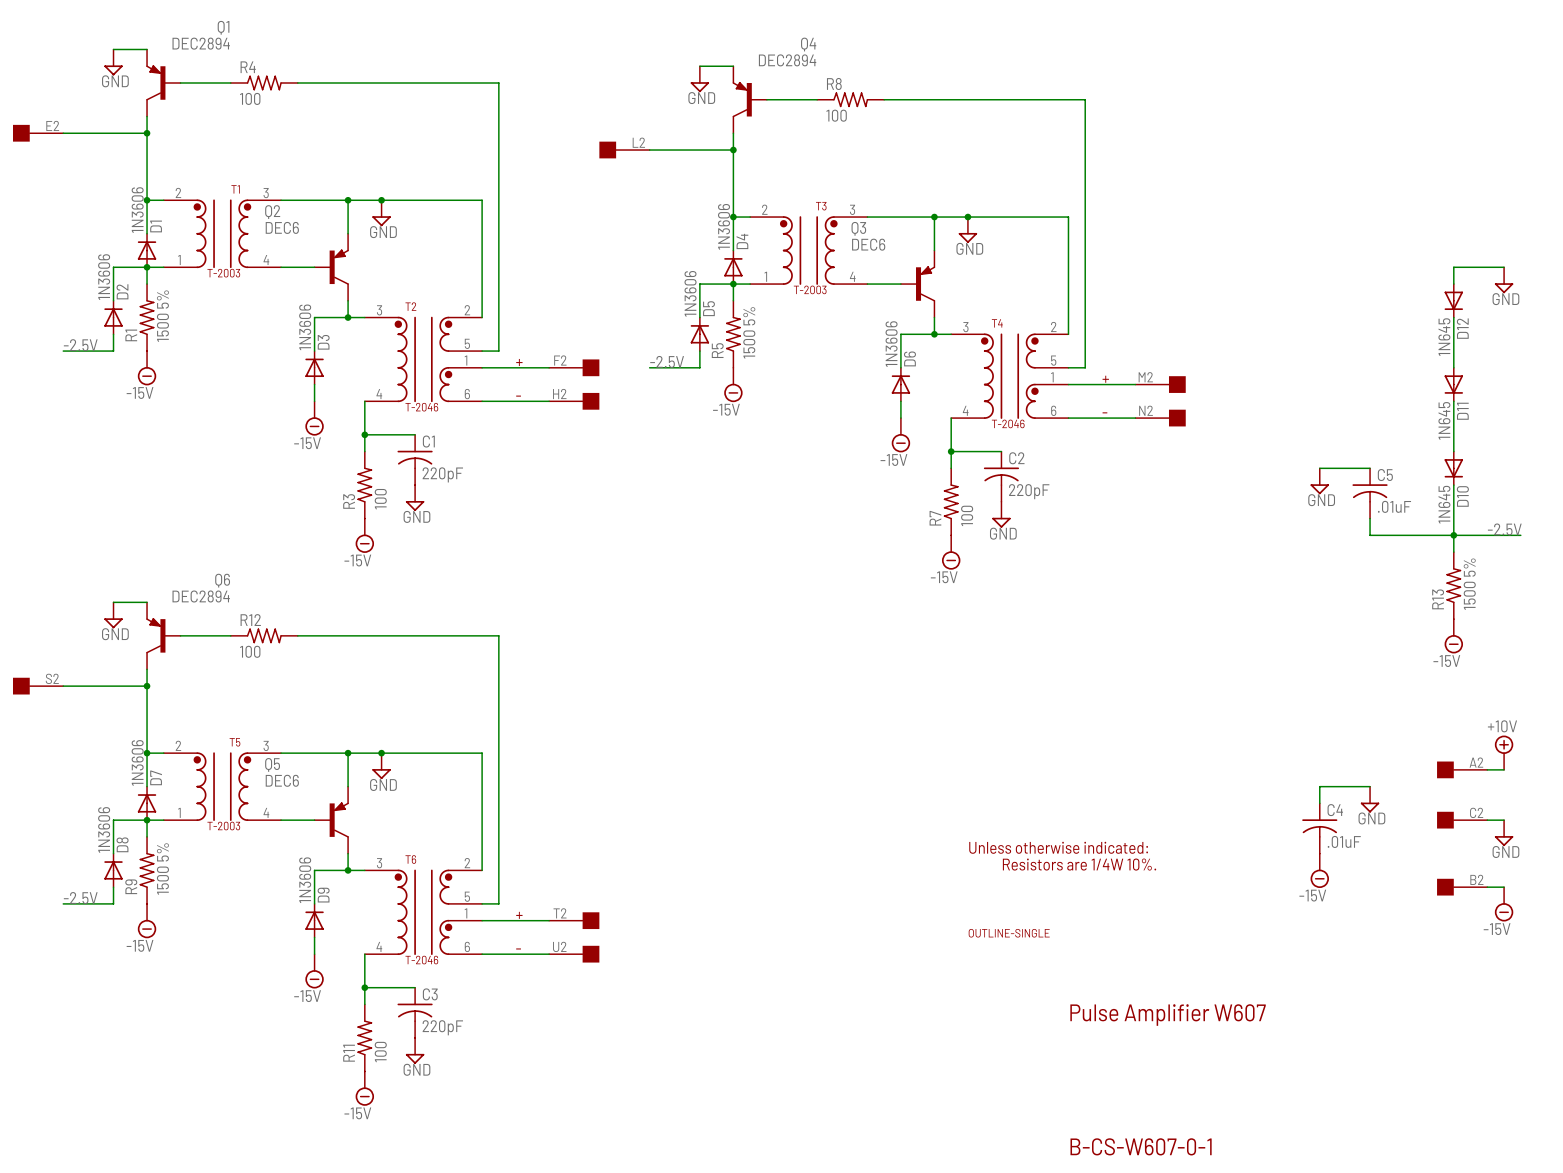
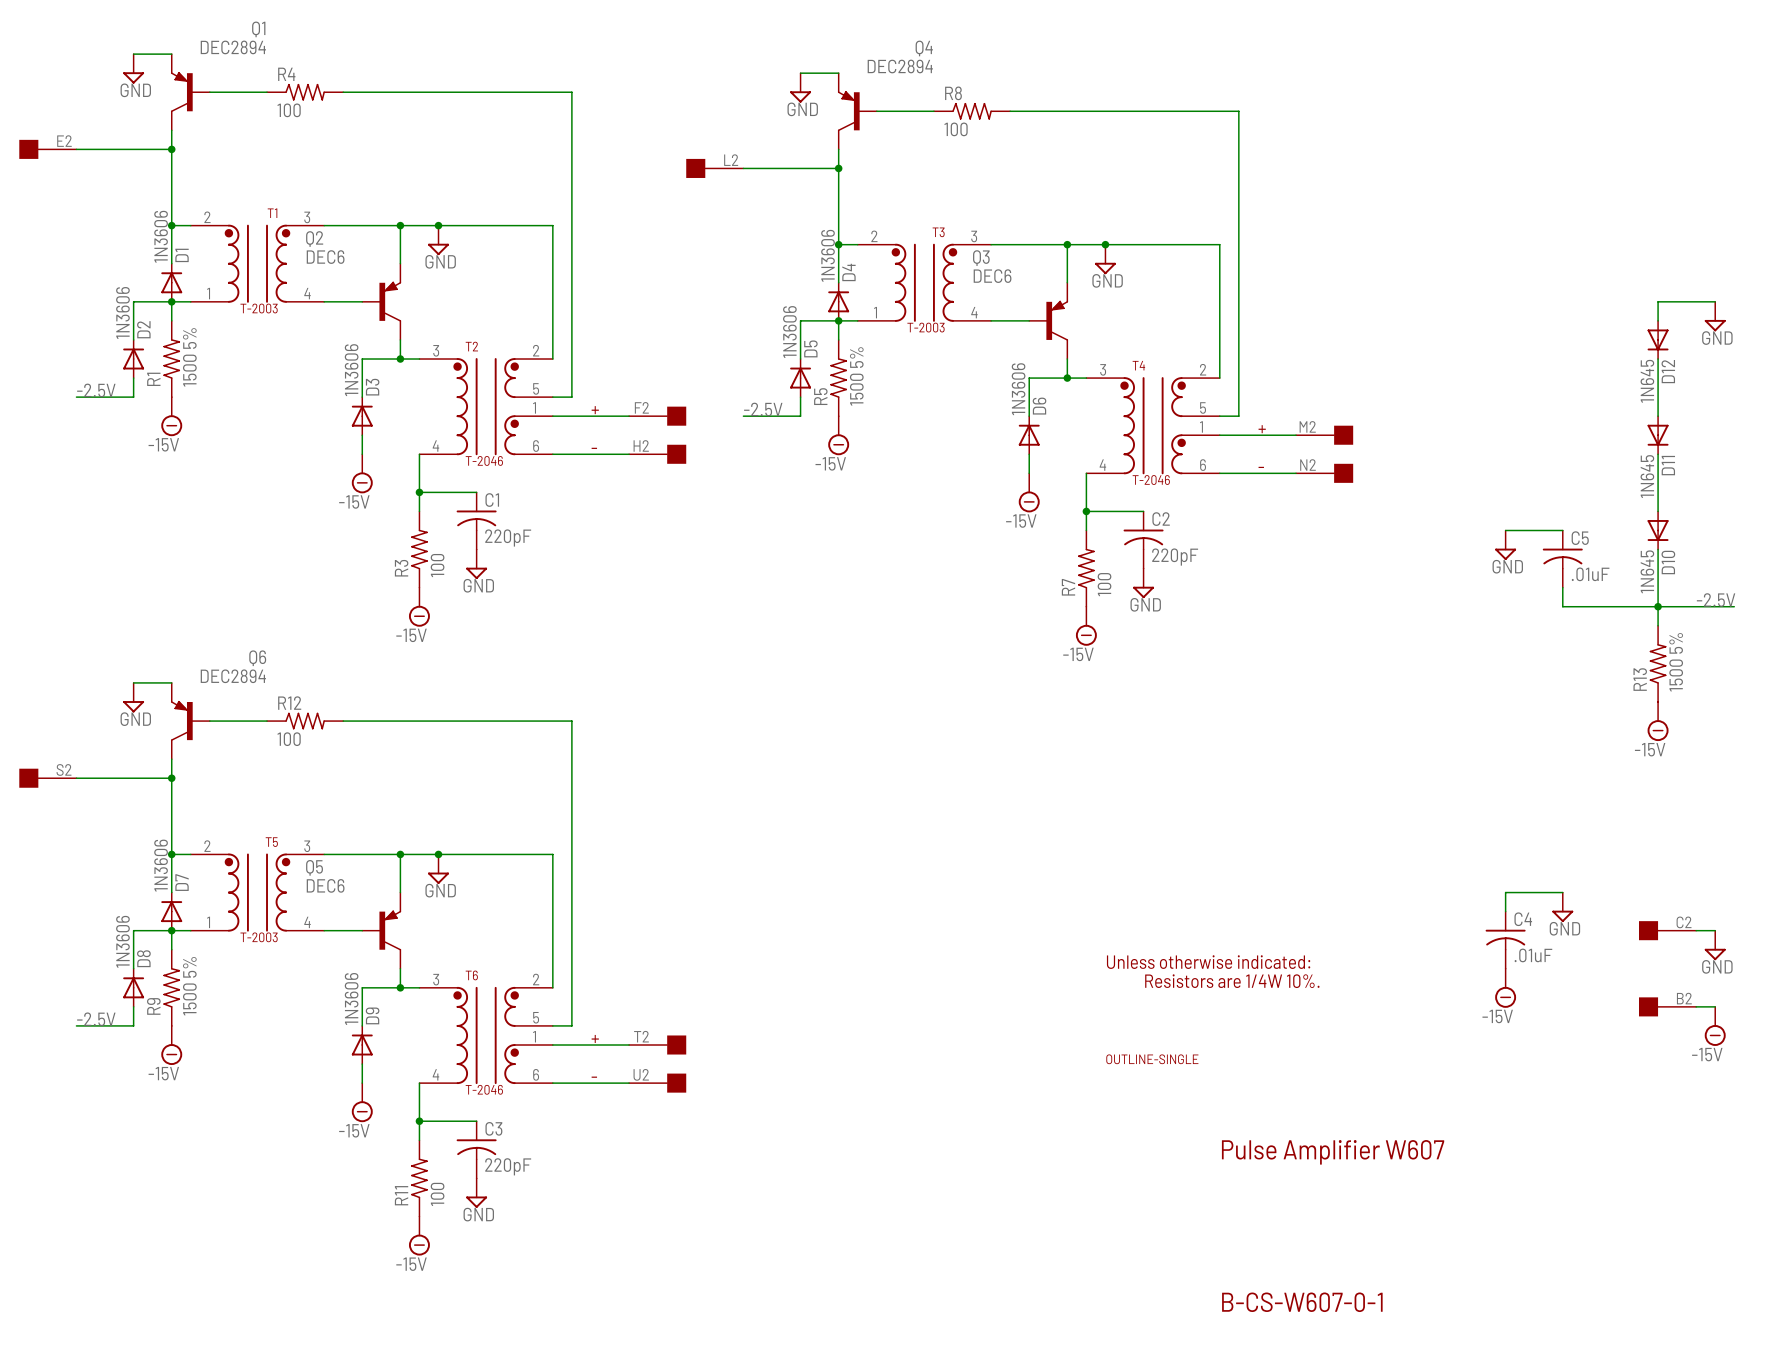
power symbol: +10V (1504, 752) -> none
part: (1462, 769) -> none
wire: (1487, 769) (1504, 769) -> none

